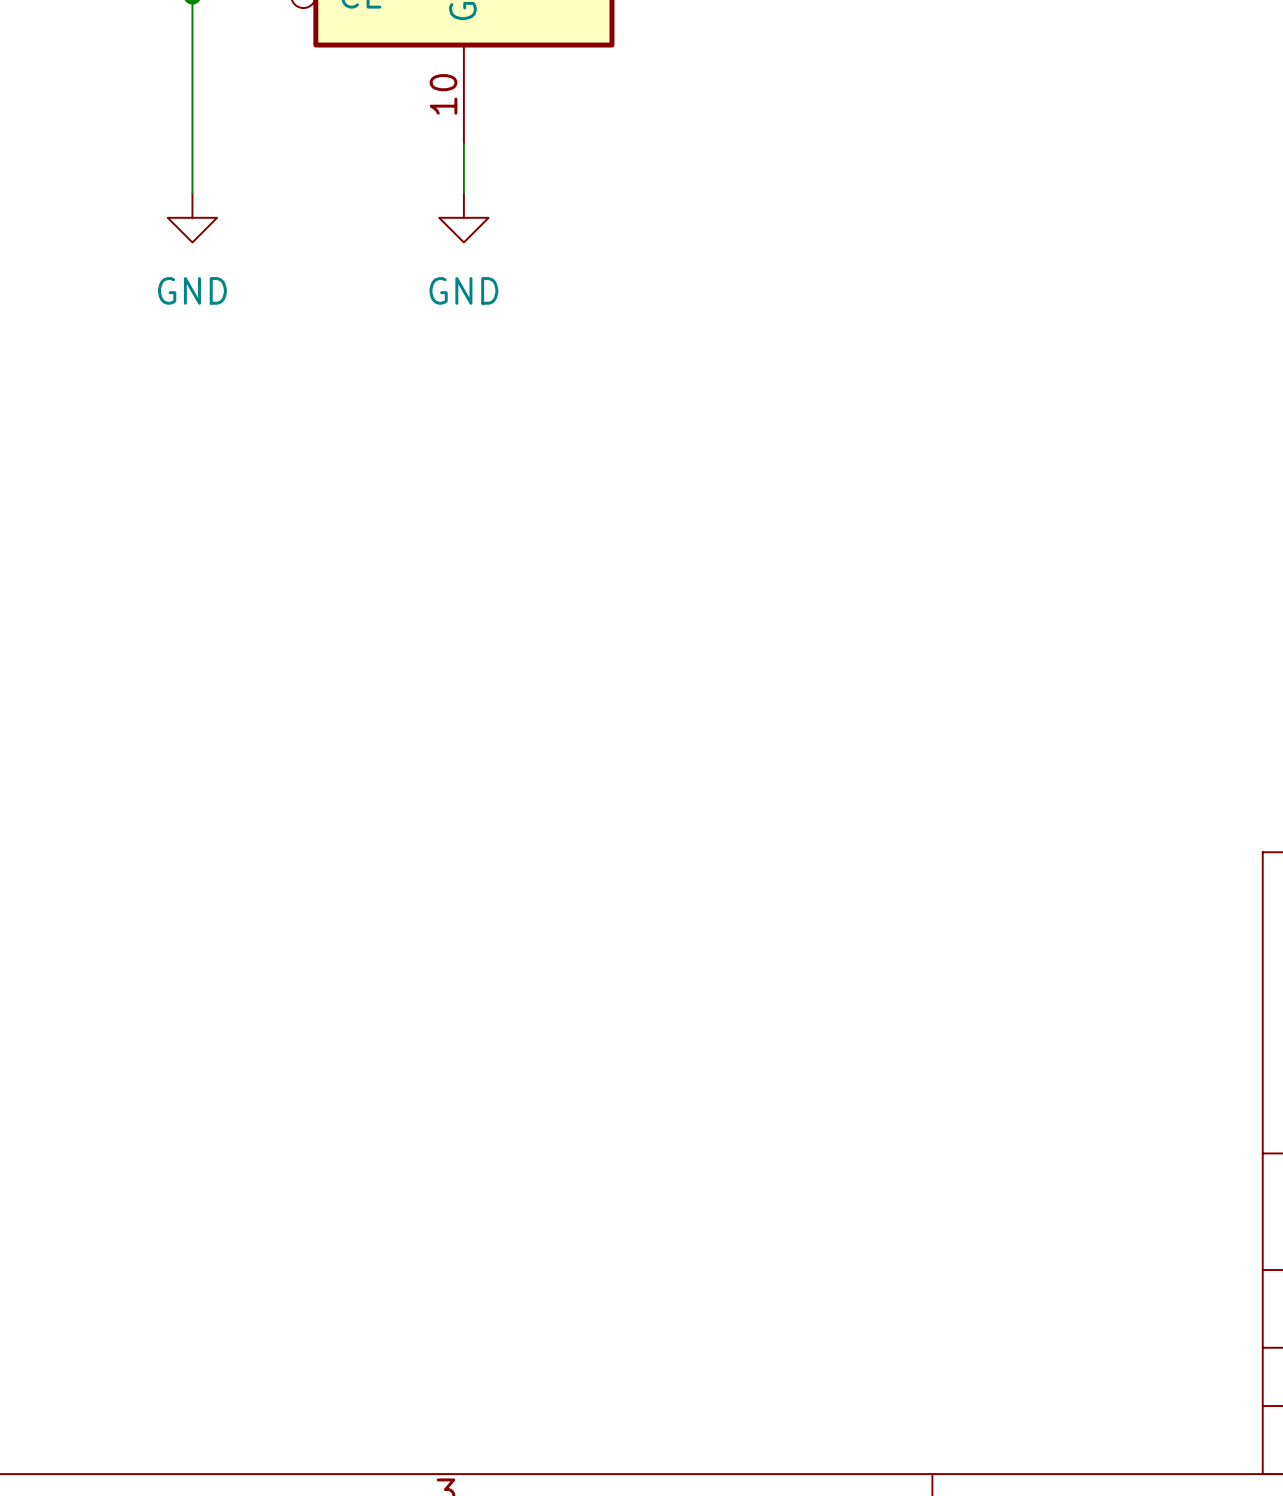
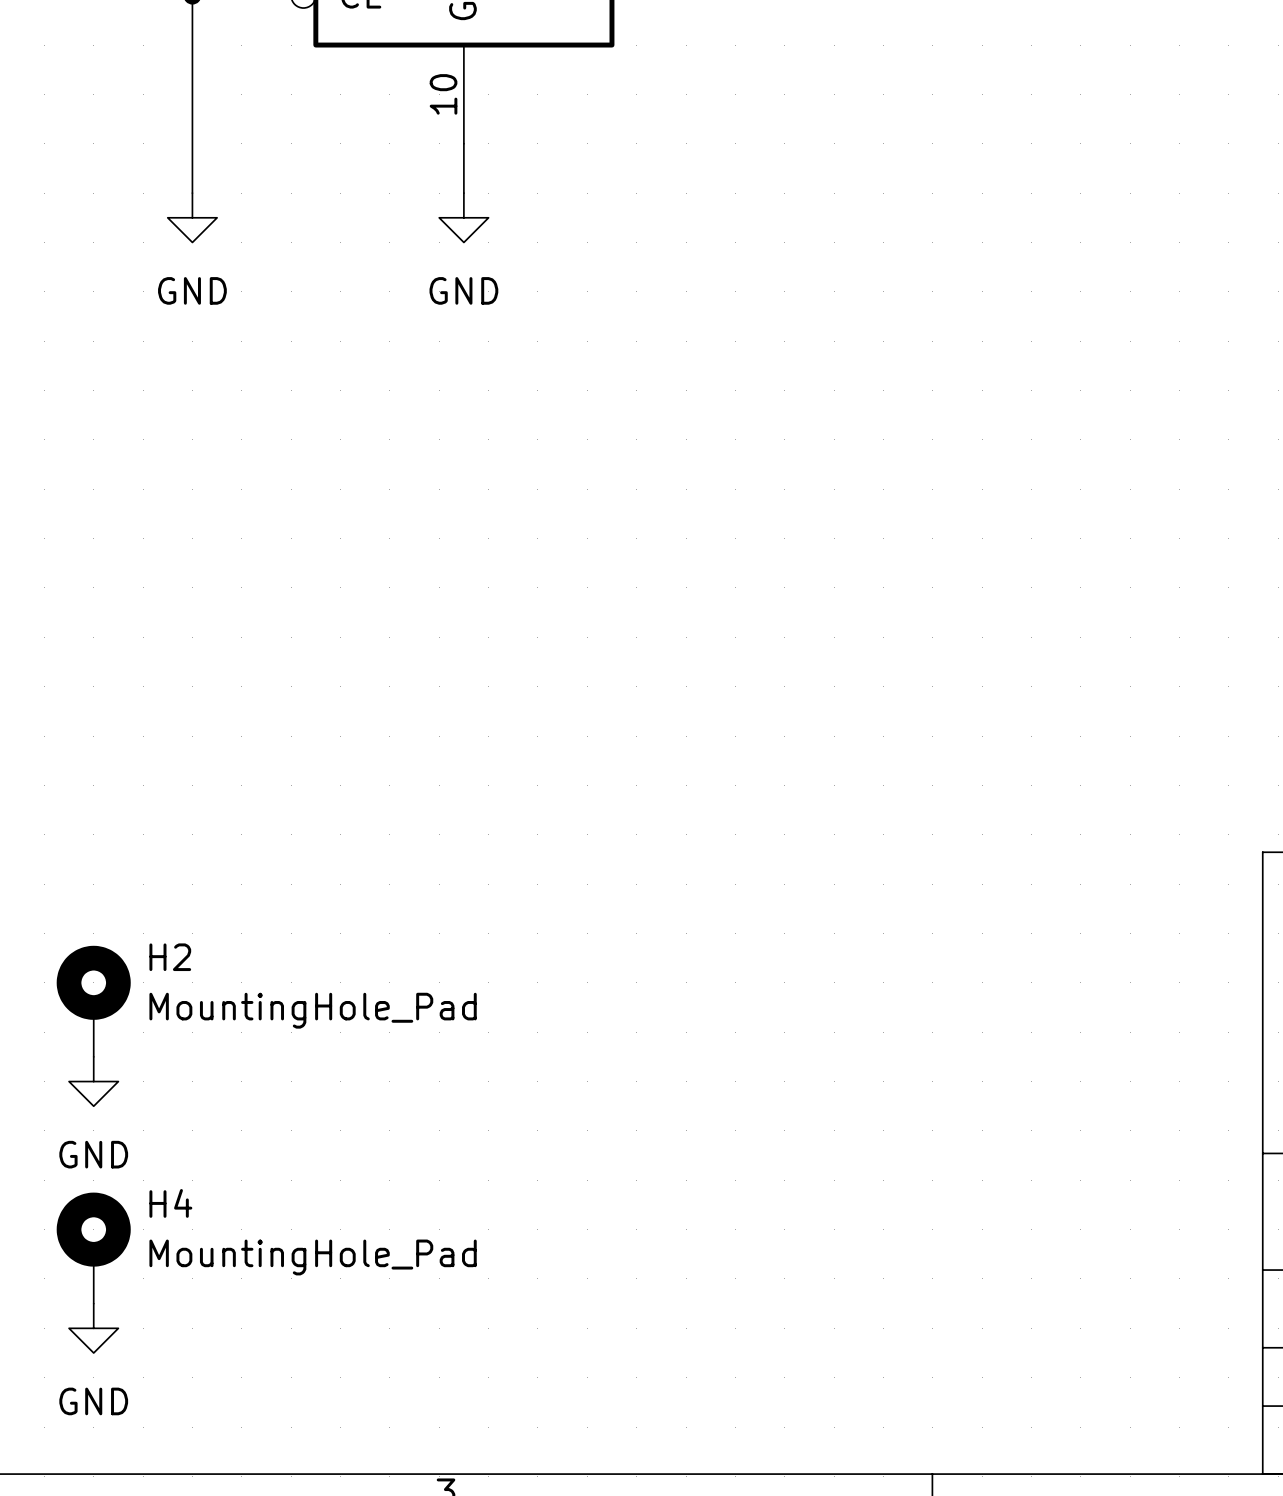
H2: none -> MountingHole_Pad (93, 1001)
power symbol: none -> GND (93, 1081)
H4: none -> MountingHole_Pad (93, 1248)
power symbol: none -> GND (93, 1328)

